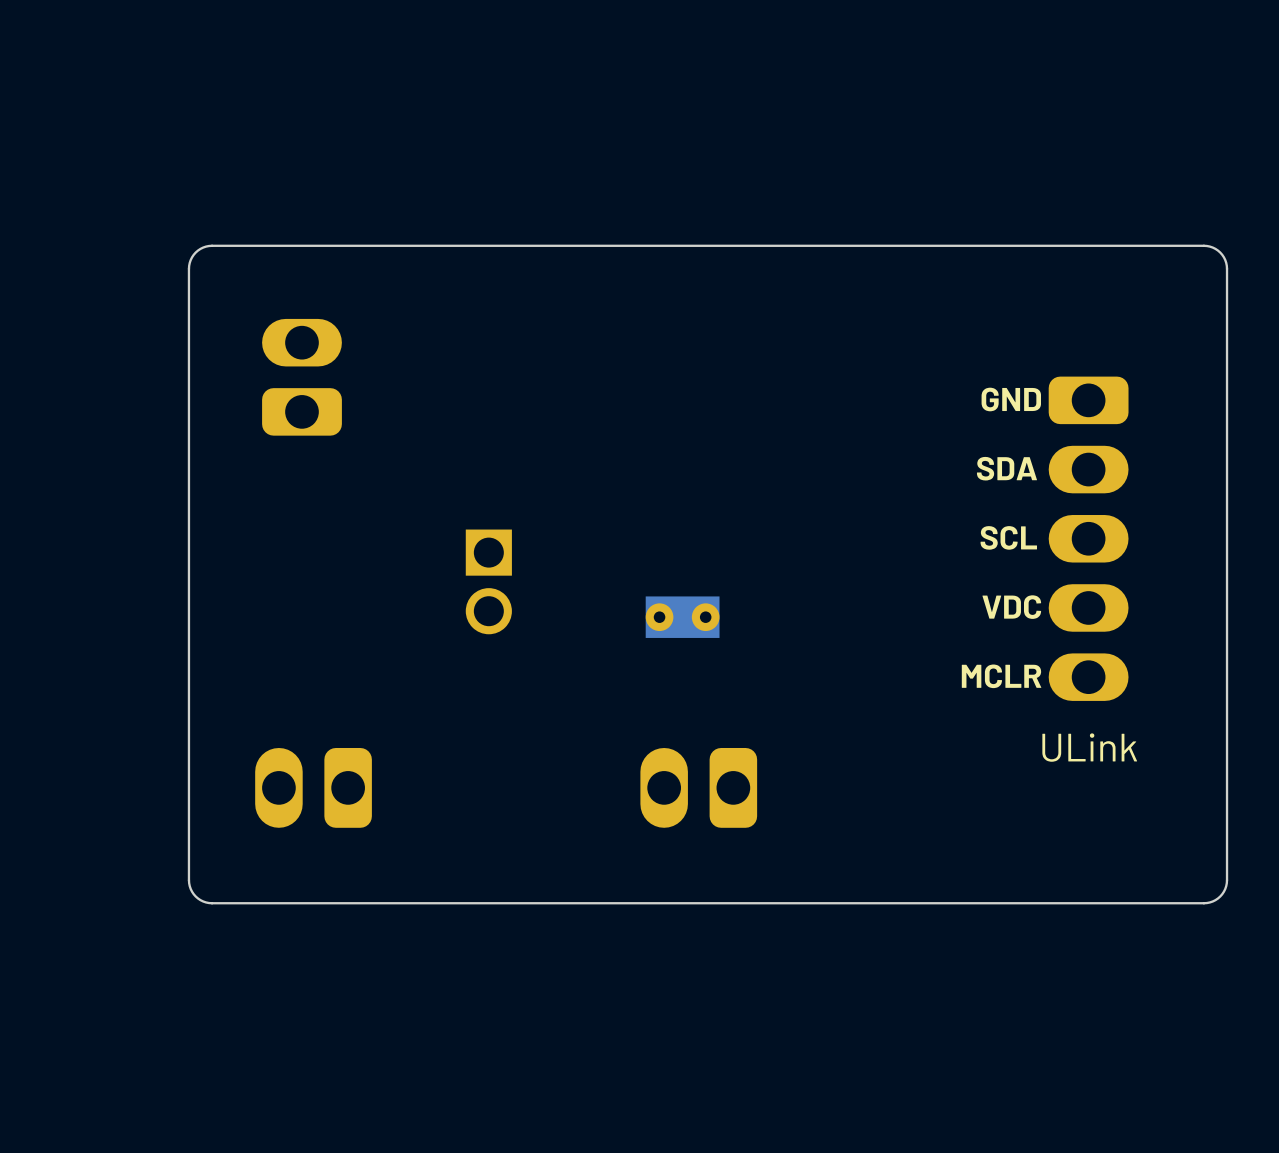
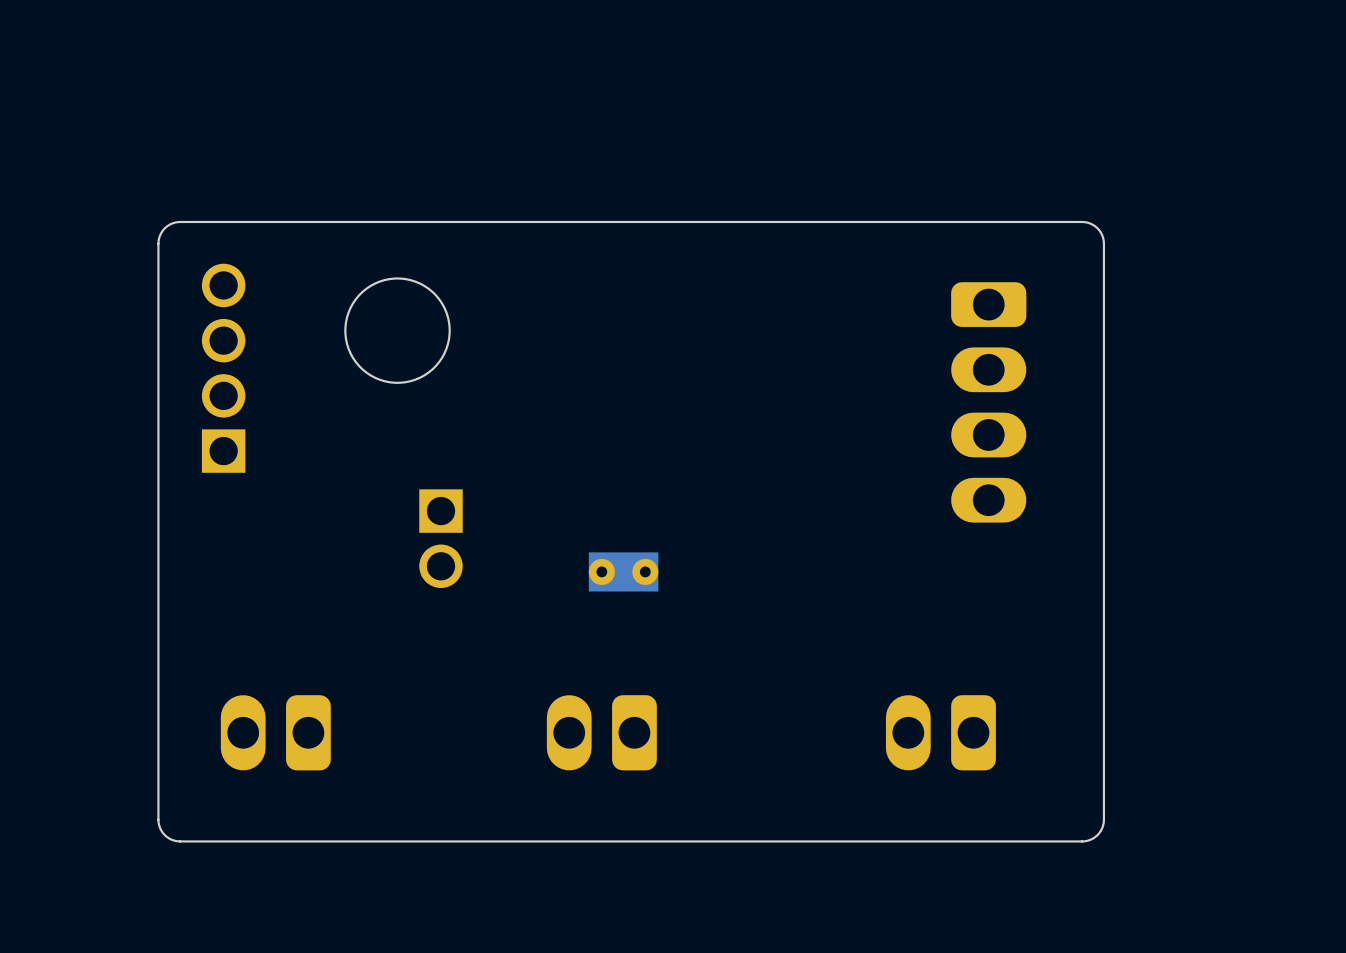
board edge: (1169, 245) (1212, 247) (1223, 257) (1227, 268) (1226, 883) (1222, 894) (1212, 901) (1169, 903) -> (1082, 221) (1090, 223) (1097, 228) (1102, 235) (1103, 243) (1103, 819) (1102, 828) (1097, 835) (1090, 839) (1082, 841)
round board edge: none -> [344, 277, 451, 384]
part rotation: 0° (301, 377) -> 90° counterclockwise (940, 732)
part position: (301, 377) -> (940, 732)
text: GND (1011, 399) -> none
part: none -> (223, 368)
part: none -> (988, 402)
text: SDA (1006, 468) -> none
text: SCL (1008, 537) -> none
part: (1088, 538) -> none
text: VDC (1011, 607) -> none
text: MCLR (1001, 676) -> none
text: ULink (1089, 747) -> none
part position: (698, 787) -> (601, 732)

